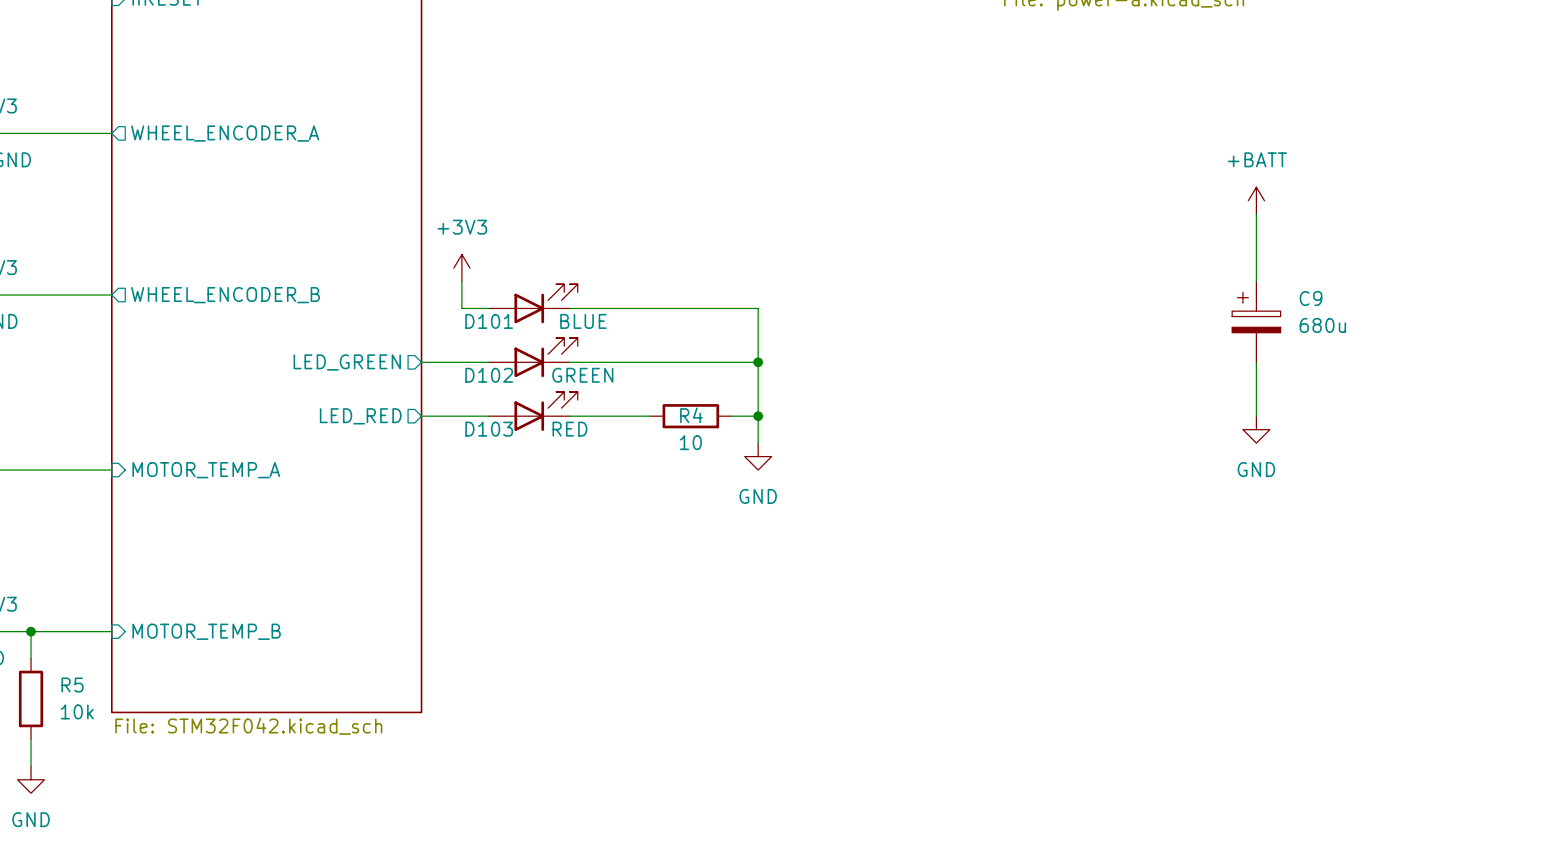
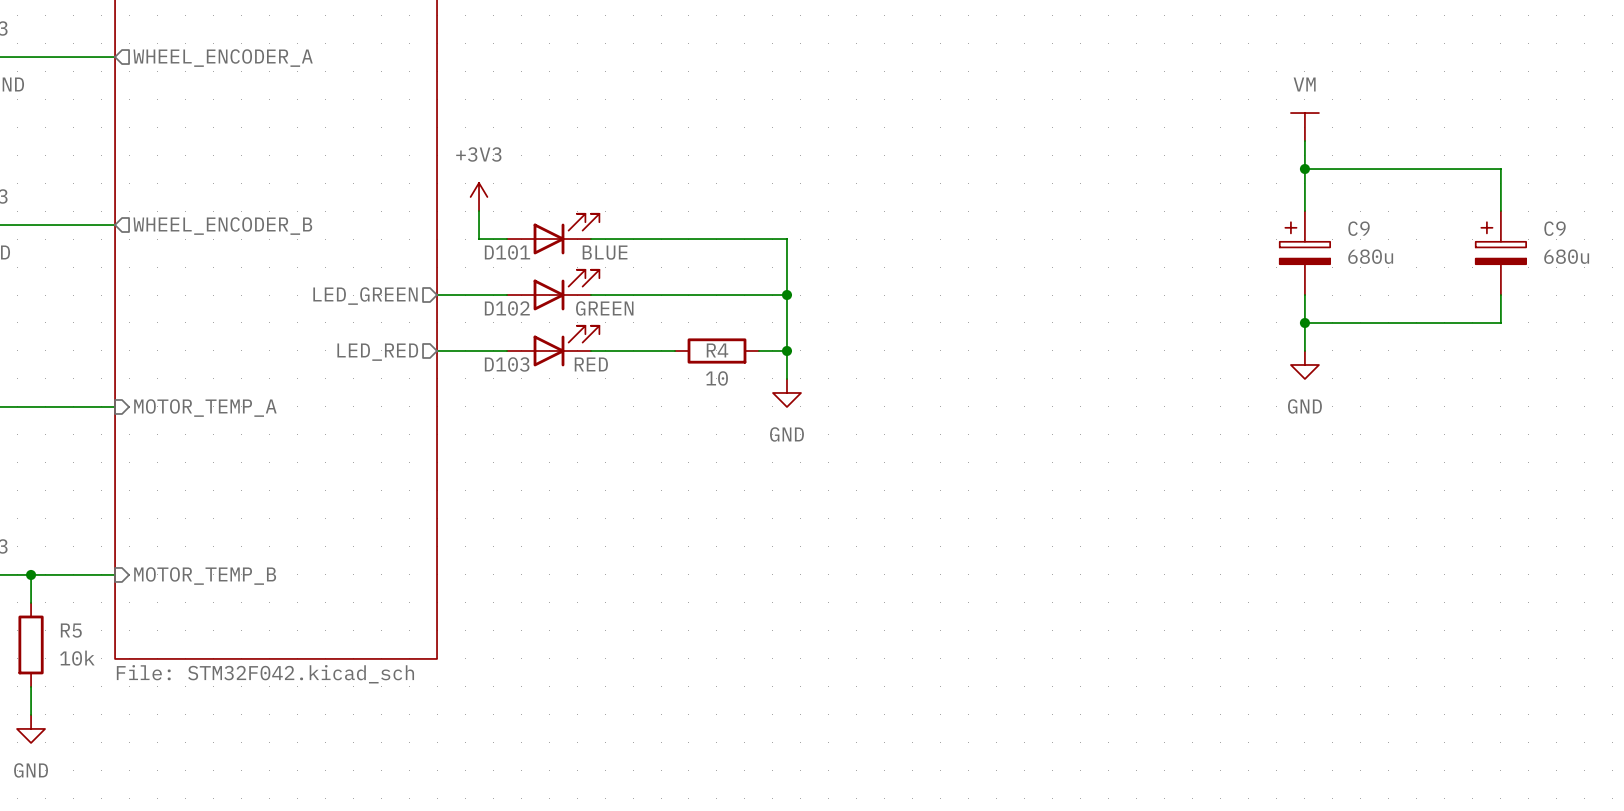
power symbol: +BATT (1256, 200) -> VM (1304, 127)
wire: none -> (1304, 169) (1500, 169) (1500, 211)
junction: none -> (1304, 169)
C9: none -> 680u (1500, 253)
wire: none -> (1500, 295) (1500, 322) (1304, 322)
junction: none -> (1304, 322)

